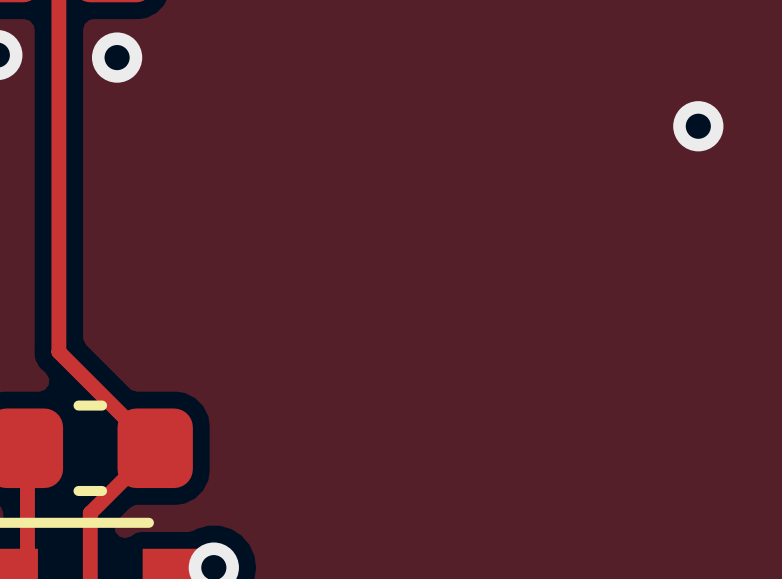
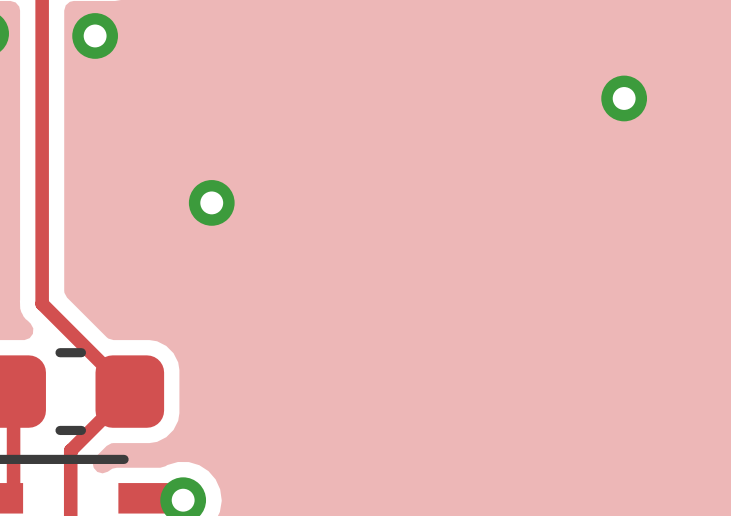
via: none -> (211, 202)

